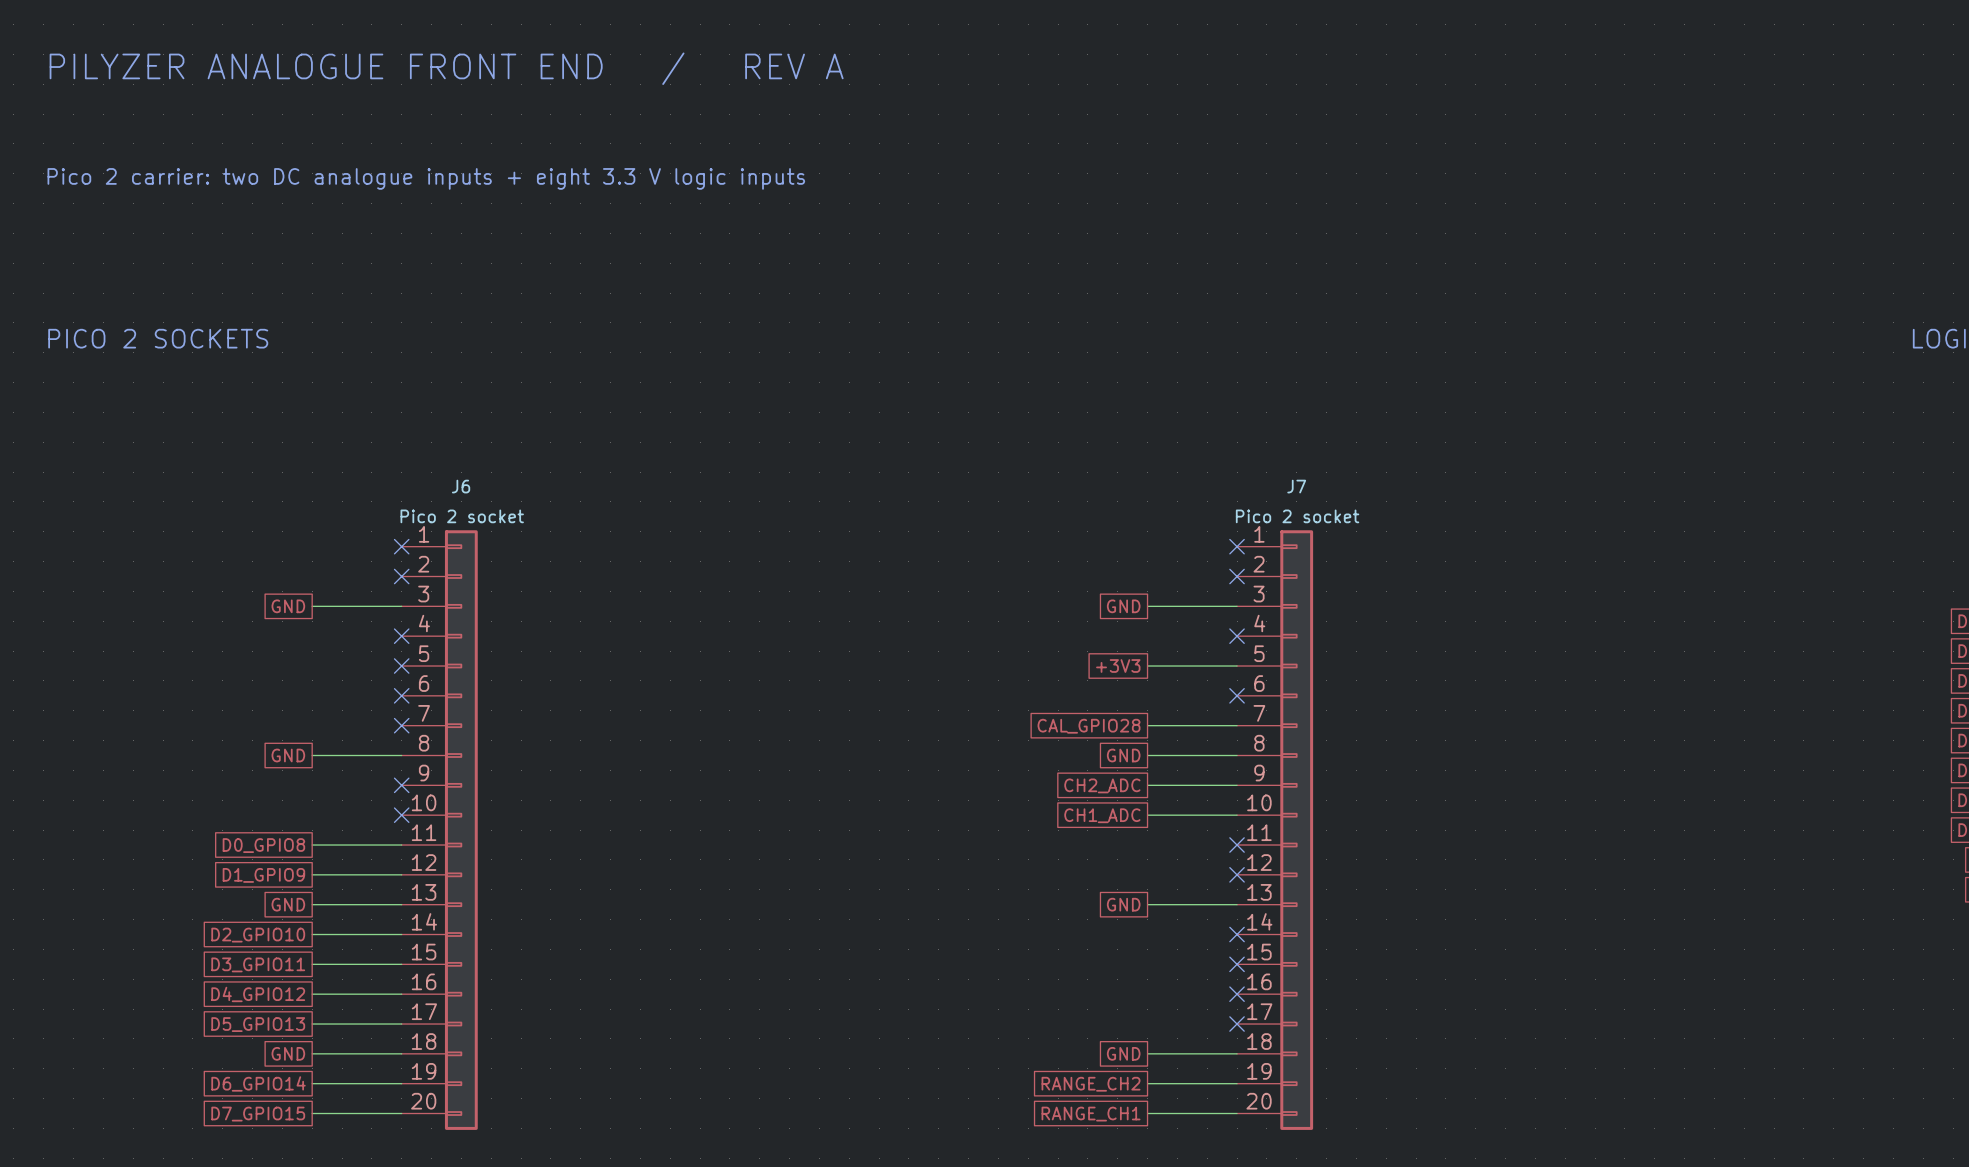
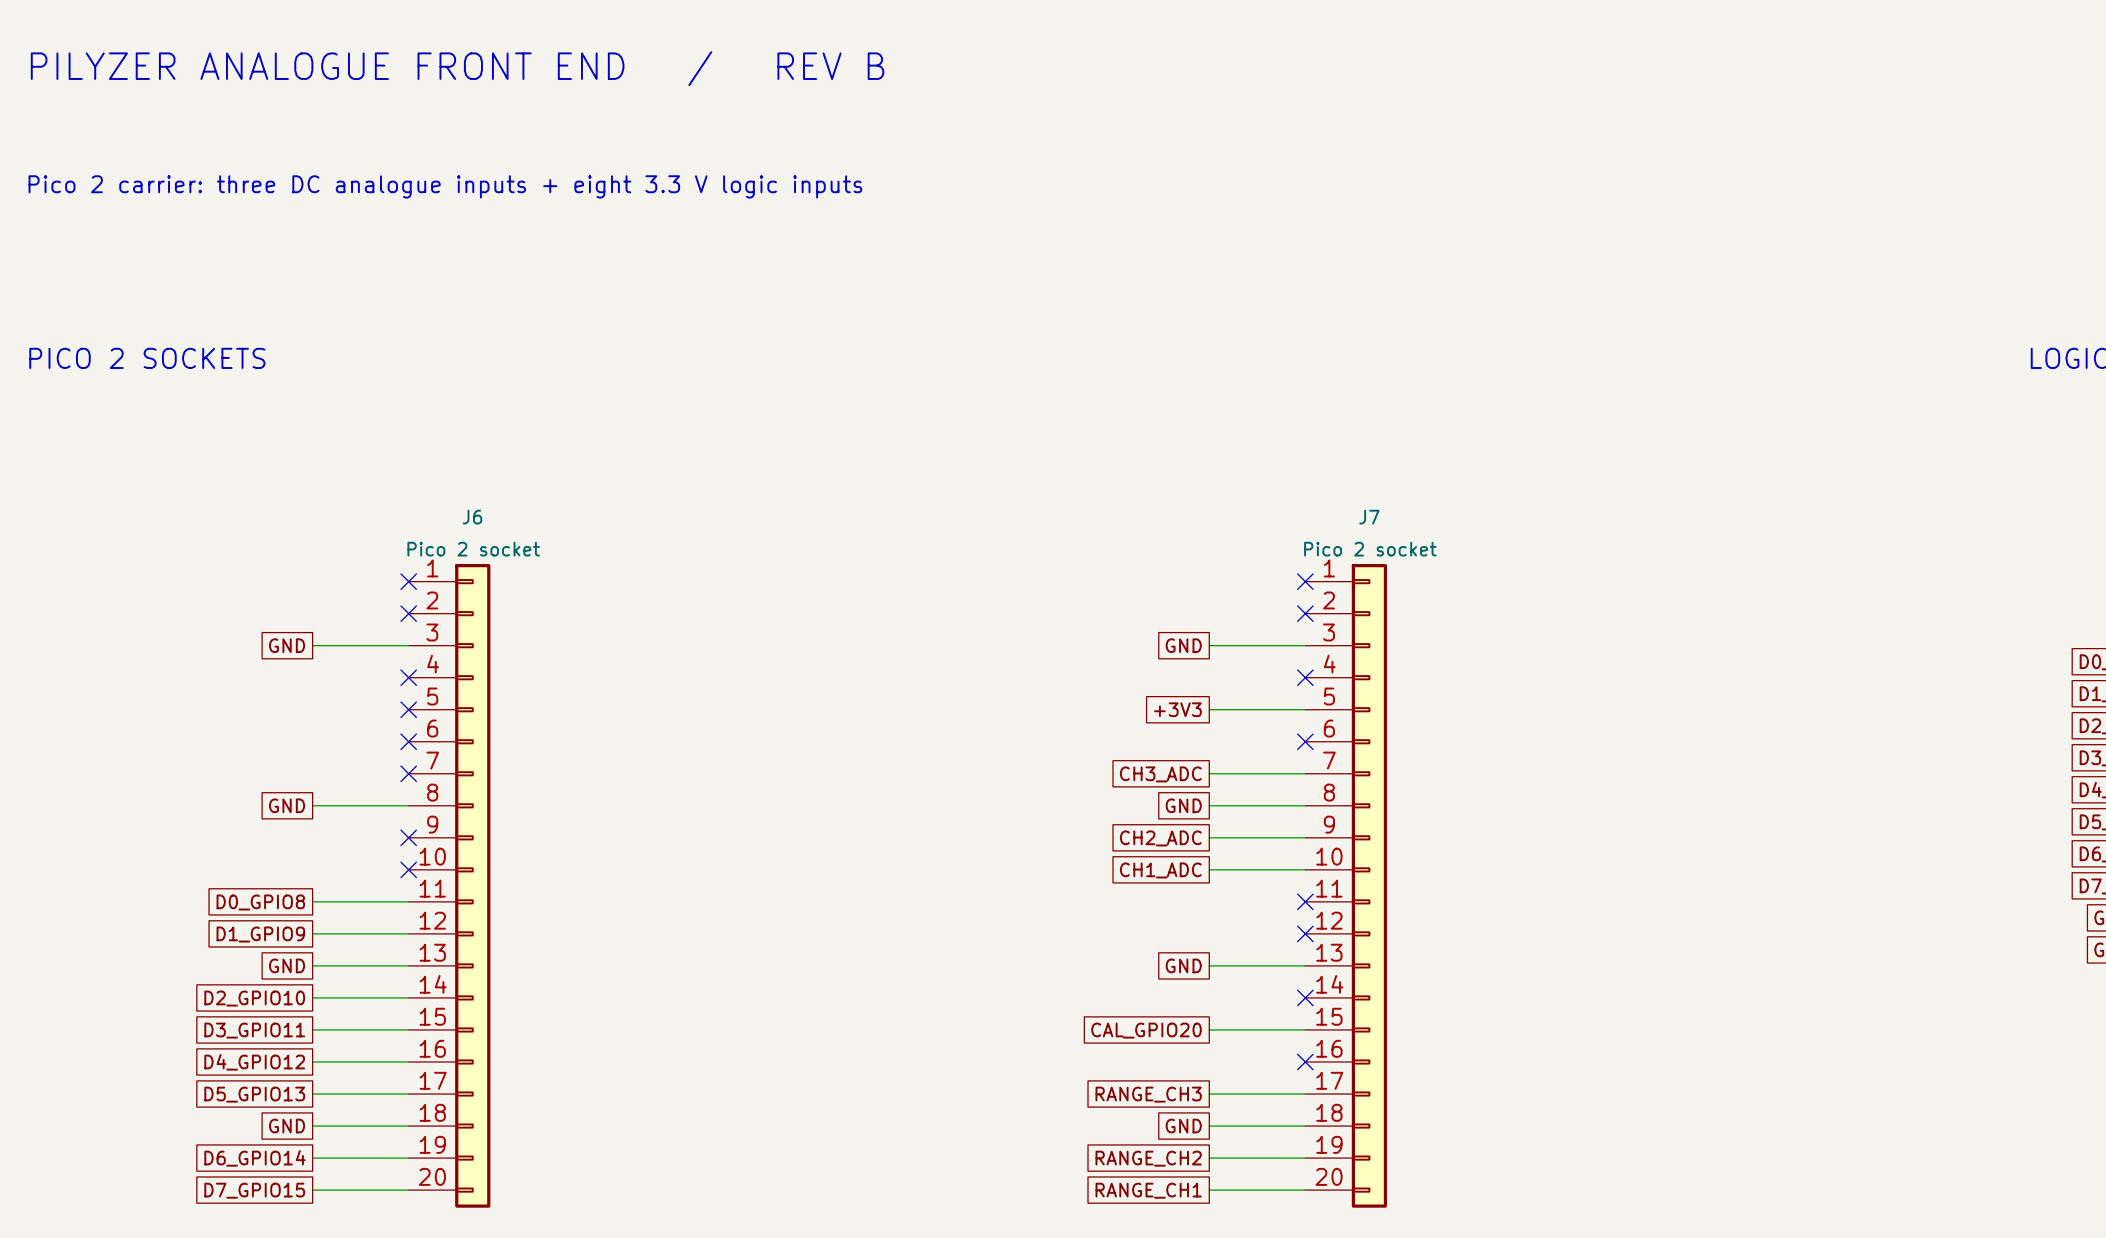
text: PILYZER ANALOGUE FRONT END / REV A (446, 68) -> PILYZER ANALOGUE FRONT END / REV B (457, 68)
text: Pico 2 carrier: two DC analogue inputs + eight 3.3 V logic inputs (426, 178) -> Pico 2 carrier: three DC analogue inputs + eight 3.3 V logic inputs (445, 186)
global label: CAL_GPIO28 (1089, 726) -> CH3_ADC (1160, 774)
global label: none -> CAL_GPIO20 (1146, 1030)
wire: none -> (1209, 1029) (1305, 1029)
no-connect mark: (1237, 964) -> none
global label: none -> RANGE_CH3 (1148, 1094)
wire: none -> (1209, 1094) (1305, 1094)
no-connect mark: (1237, 1024) -> none

